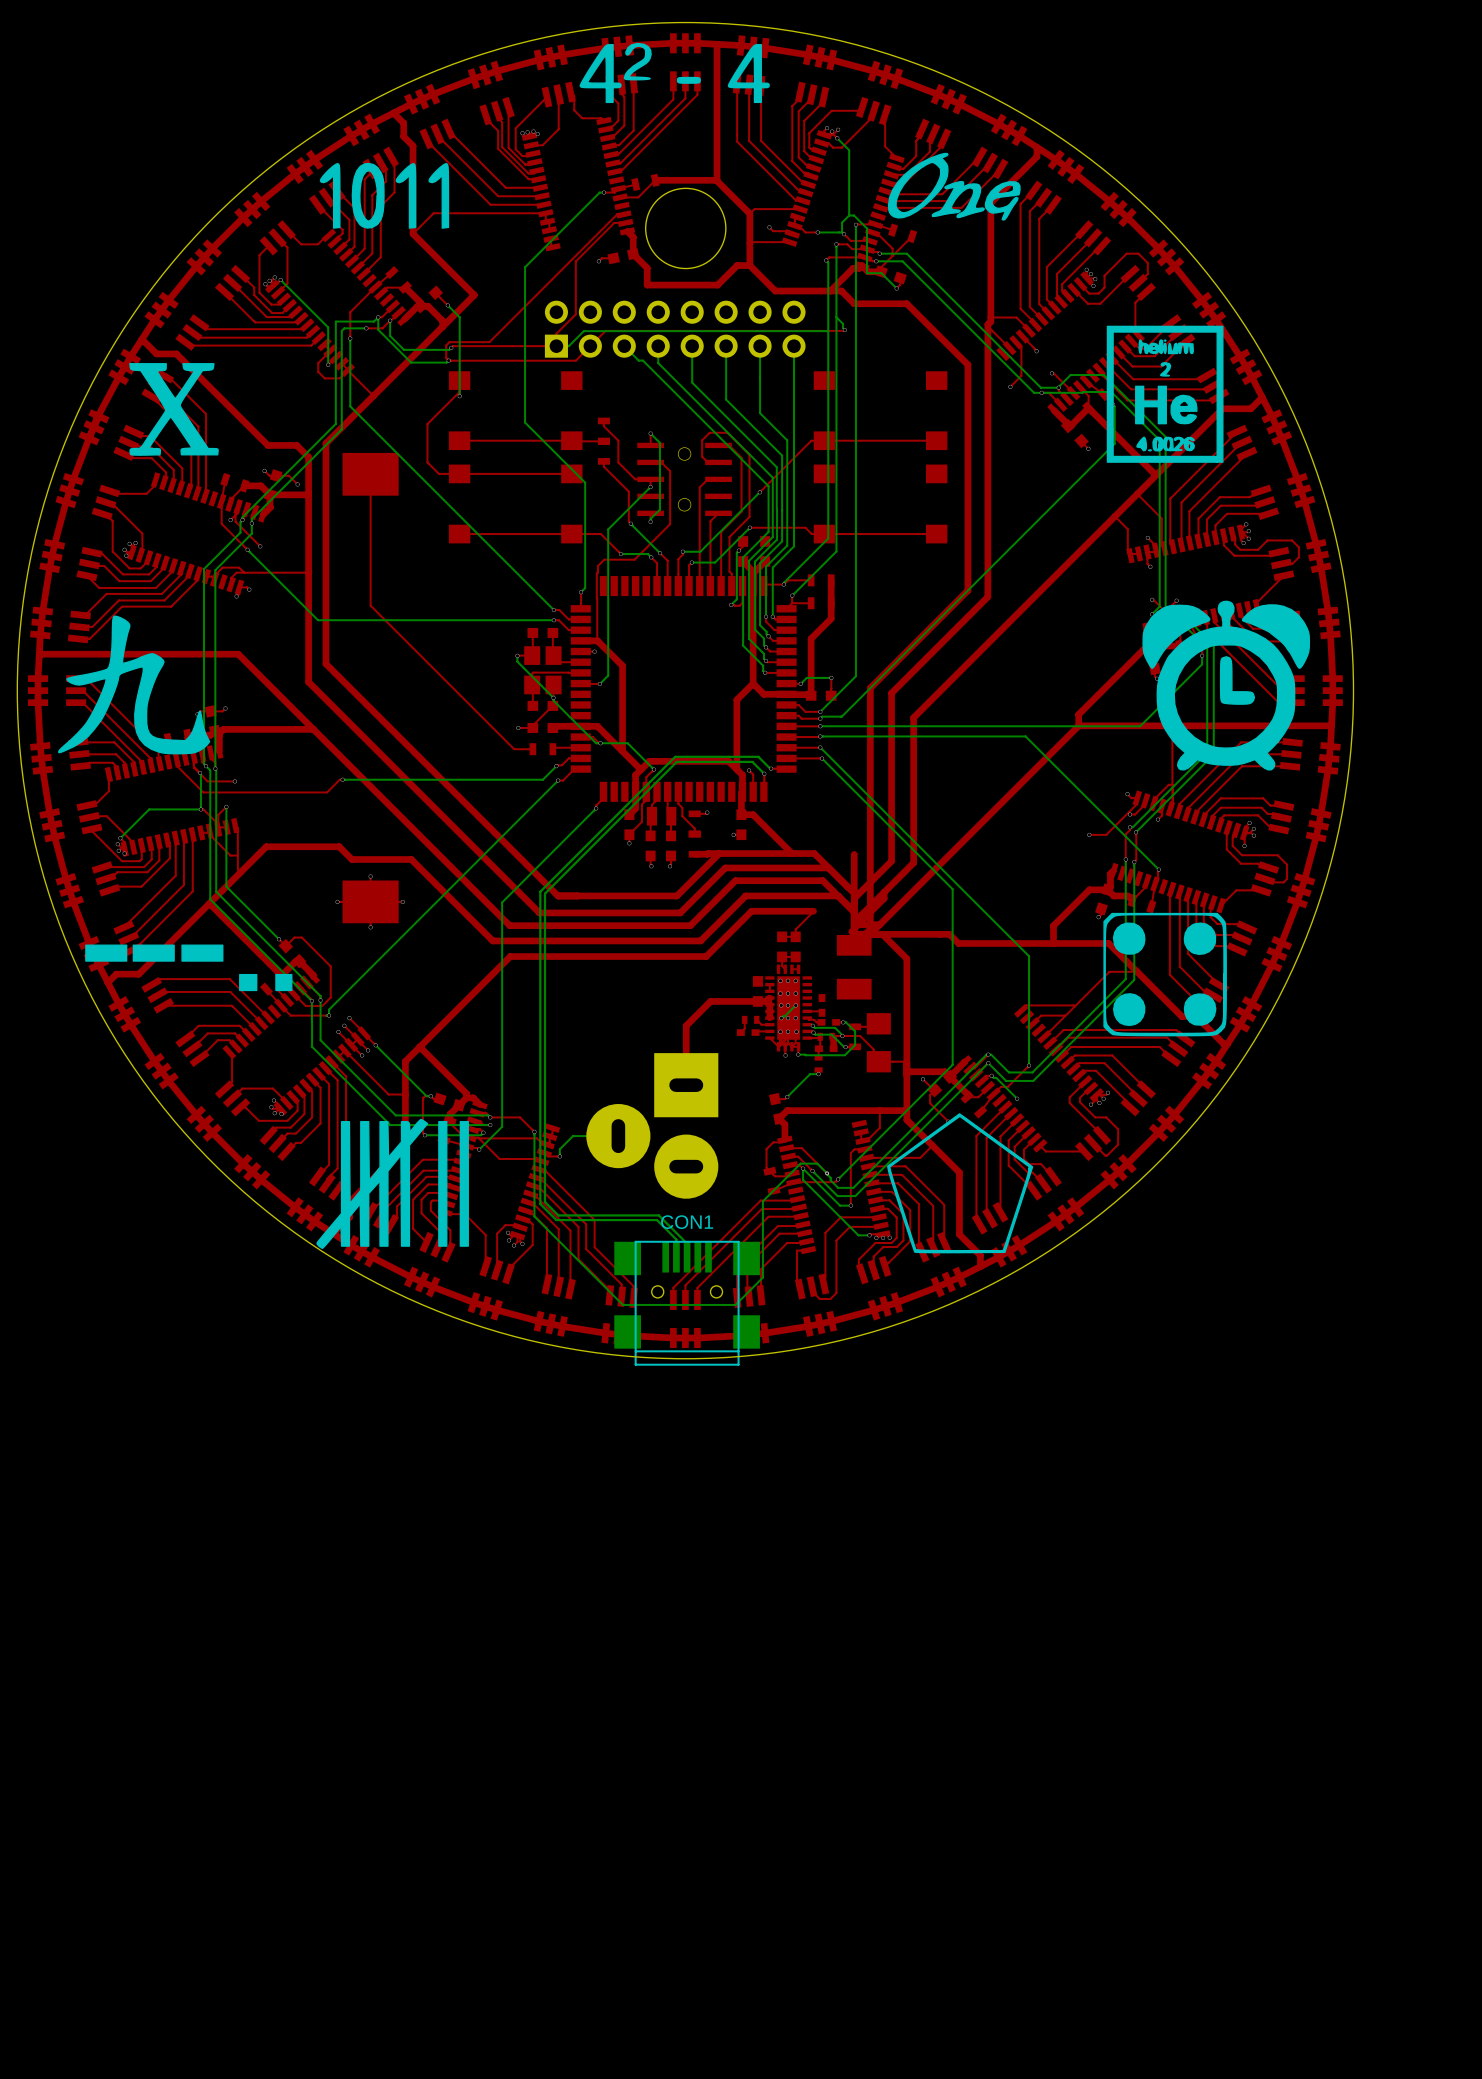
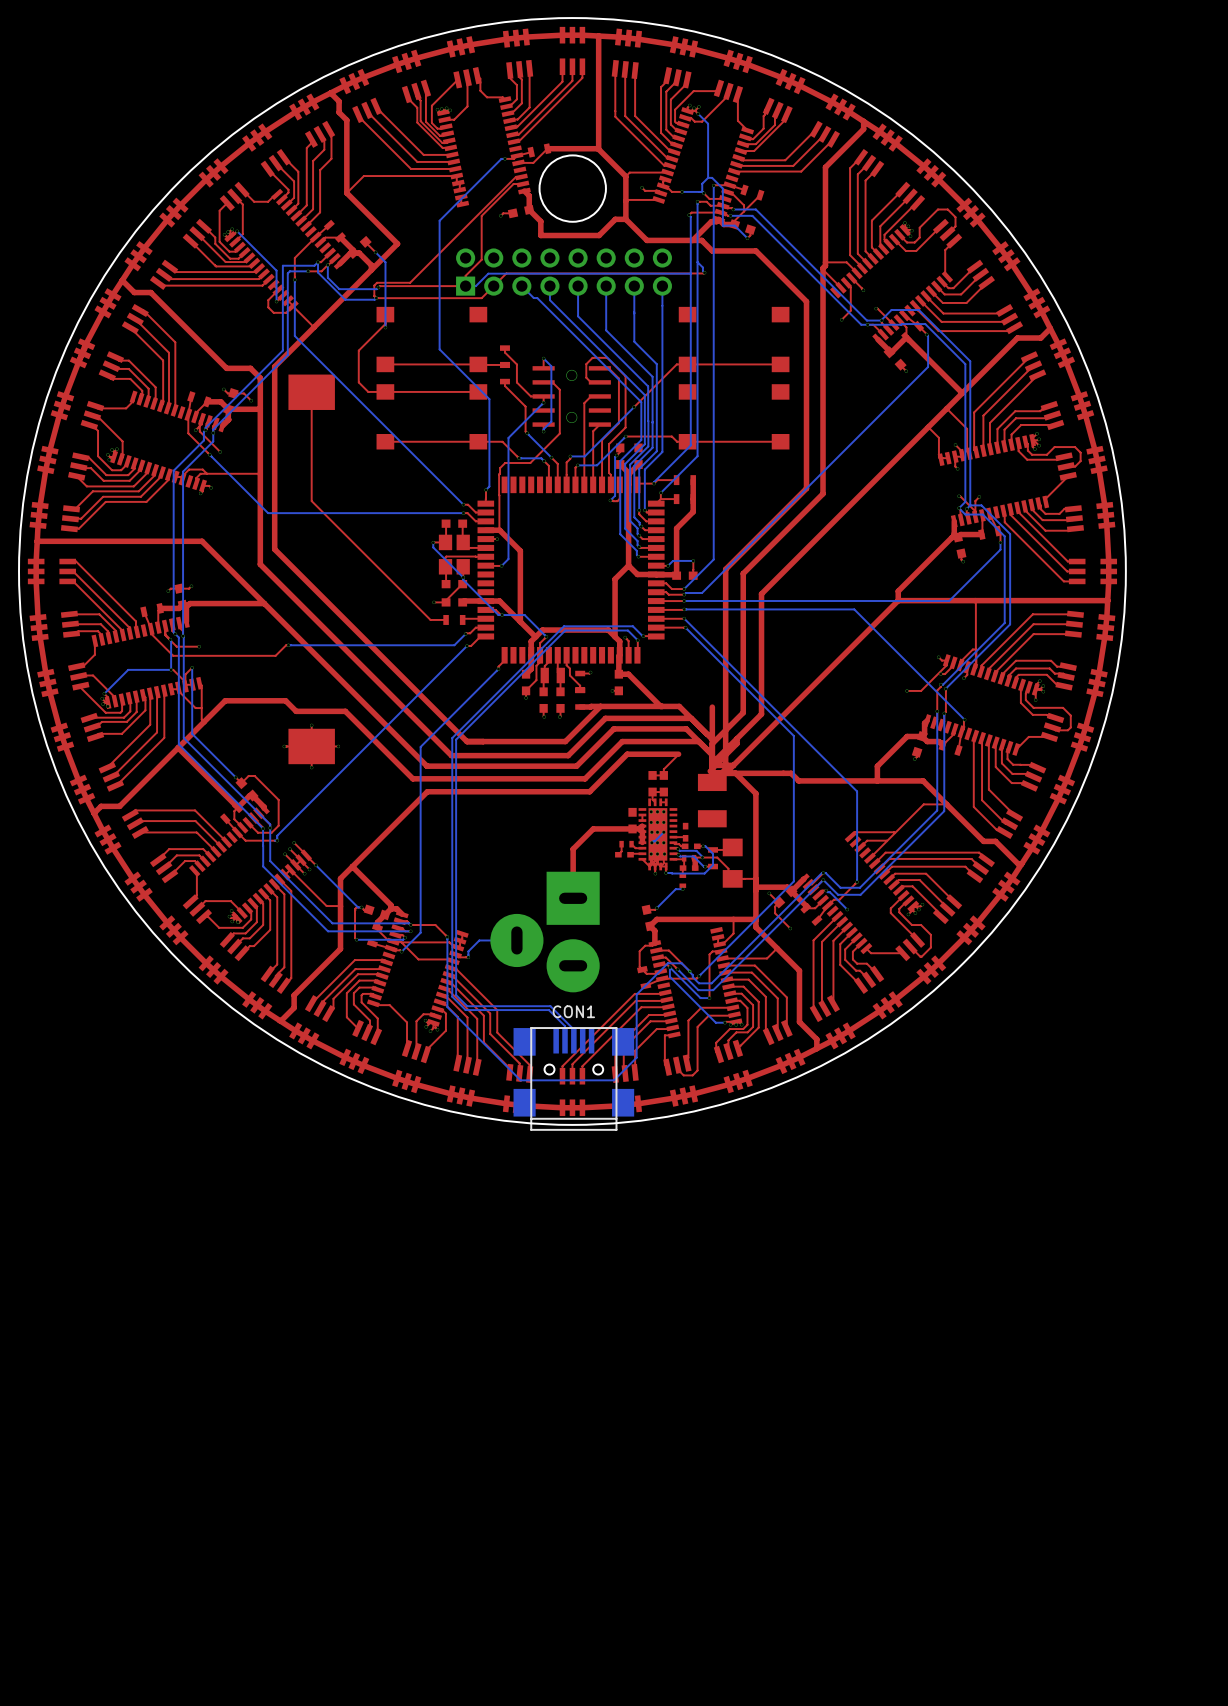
drawing: [58, 42, 1311, 1254] -> none

